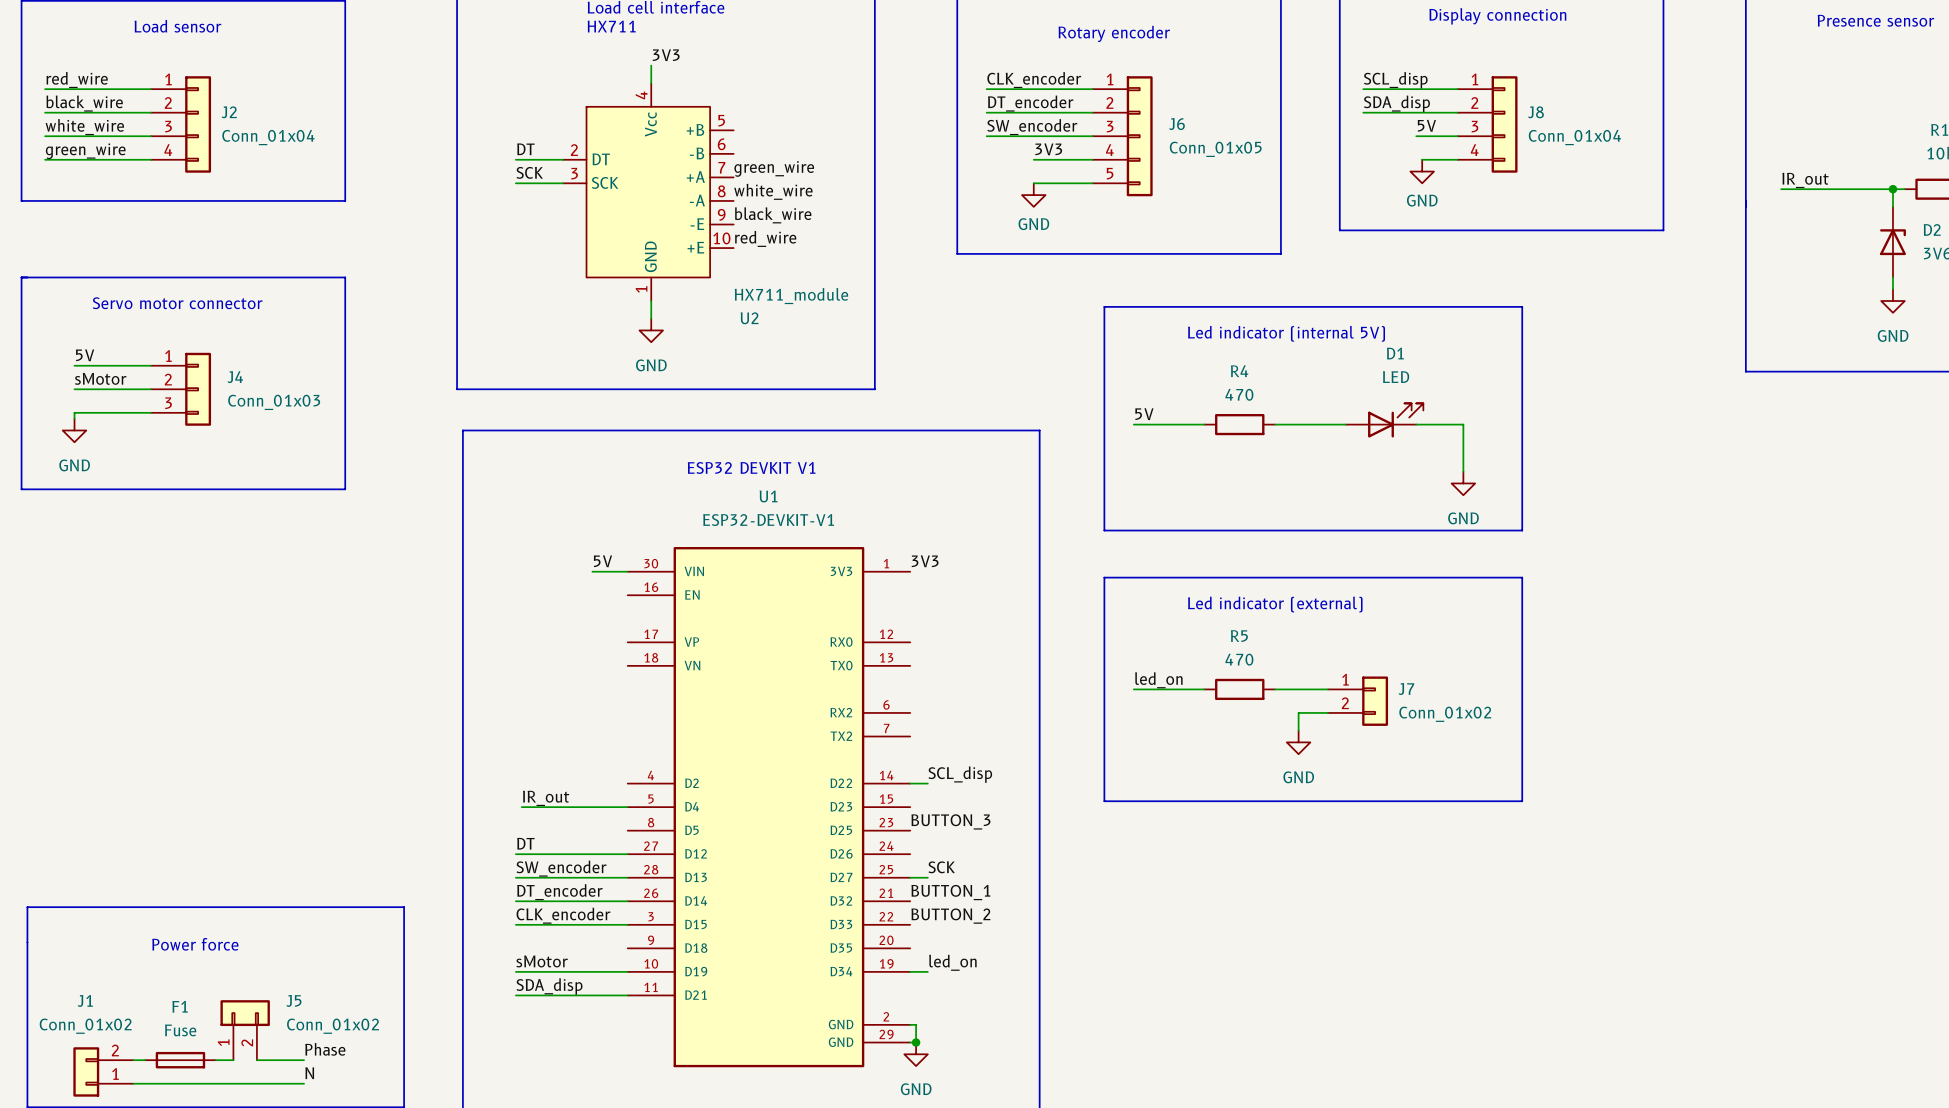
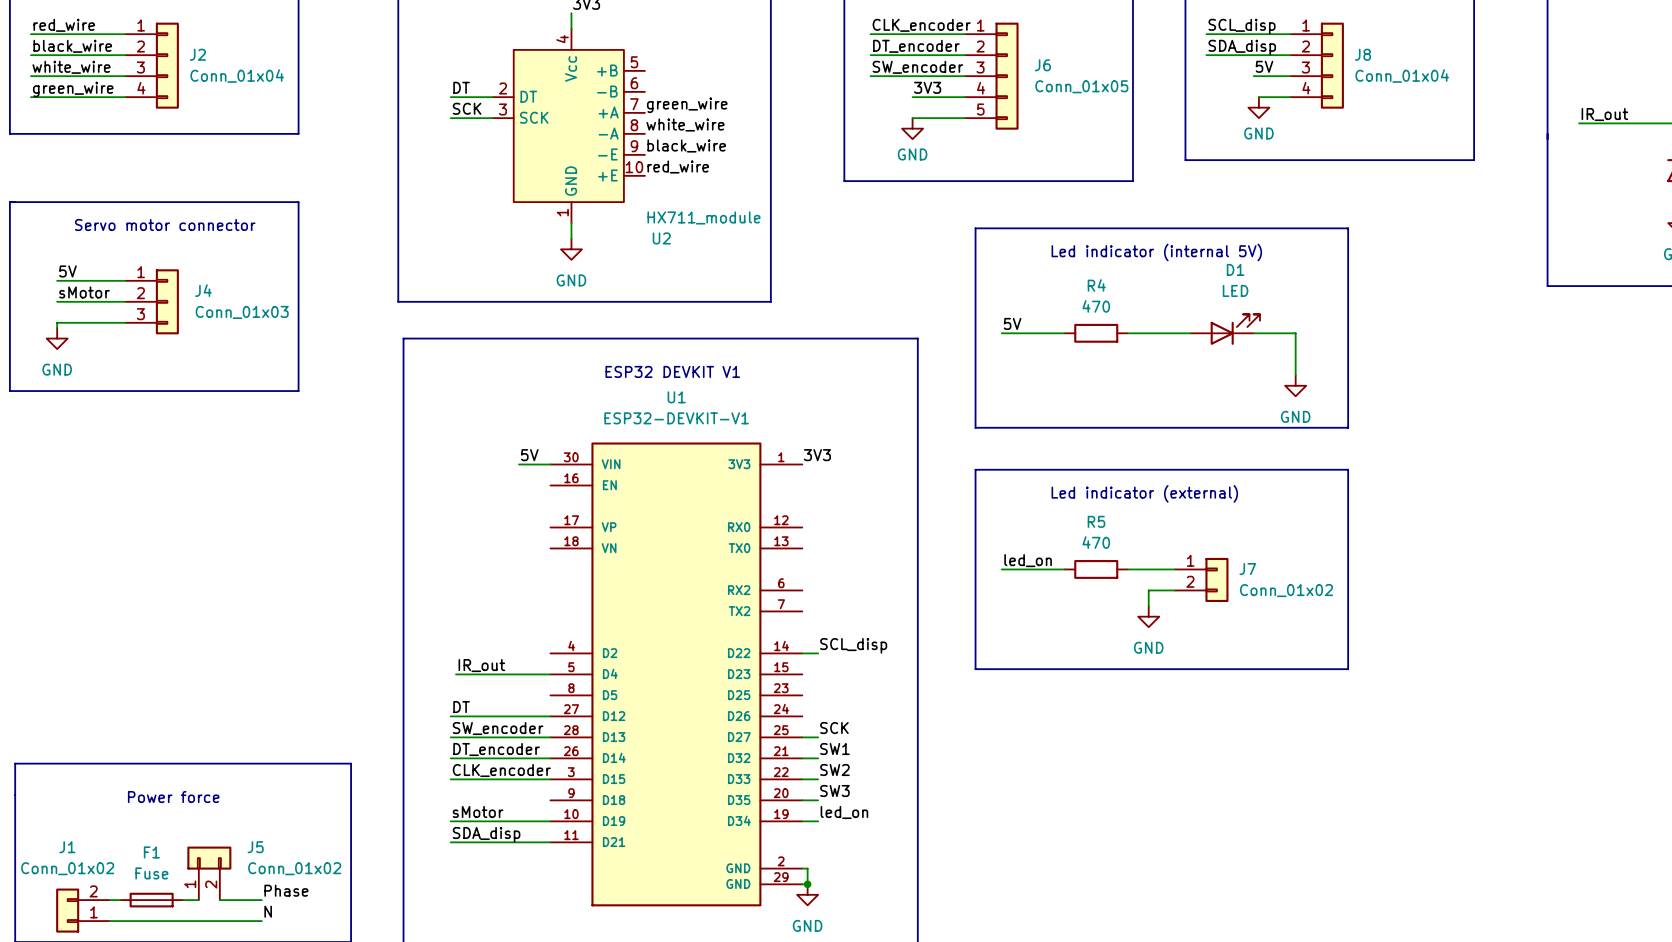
label: BUTTON_3 (950, 821) -> none
label: none -> SW1 (834, 749)
label: BUTTON_1 (950, 892) -> none
wire: none -> (802, 758) (818, 758)
label: none -> SW2 (834, 770)
label: BUTTON_2 (950, 916) -> none
wire: none -> (802, 779) (818, 779)
label: none -> SW3 (834, 791)
wire: none -> (802, 800) (818, 800)

